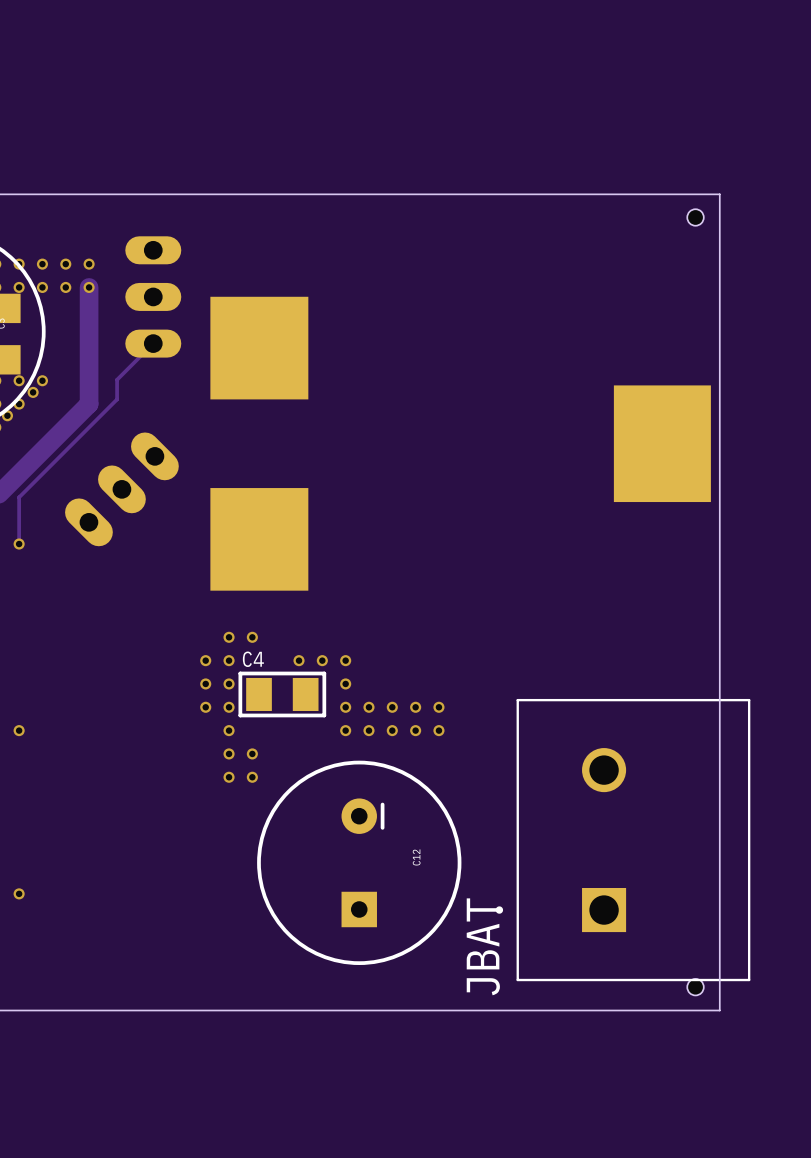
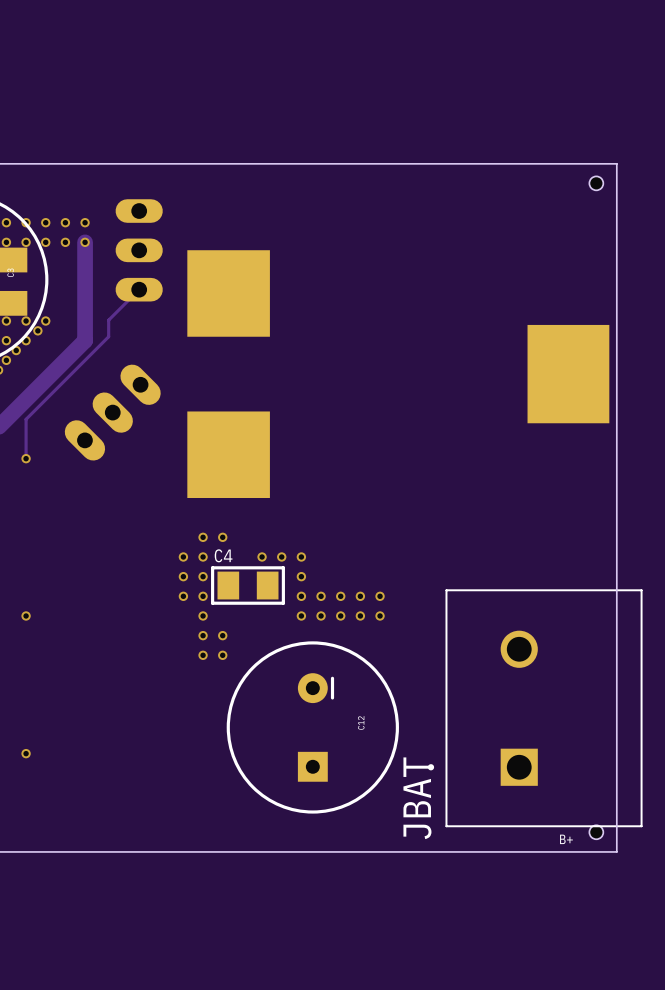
text: none -> B+ (566, 839)

